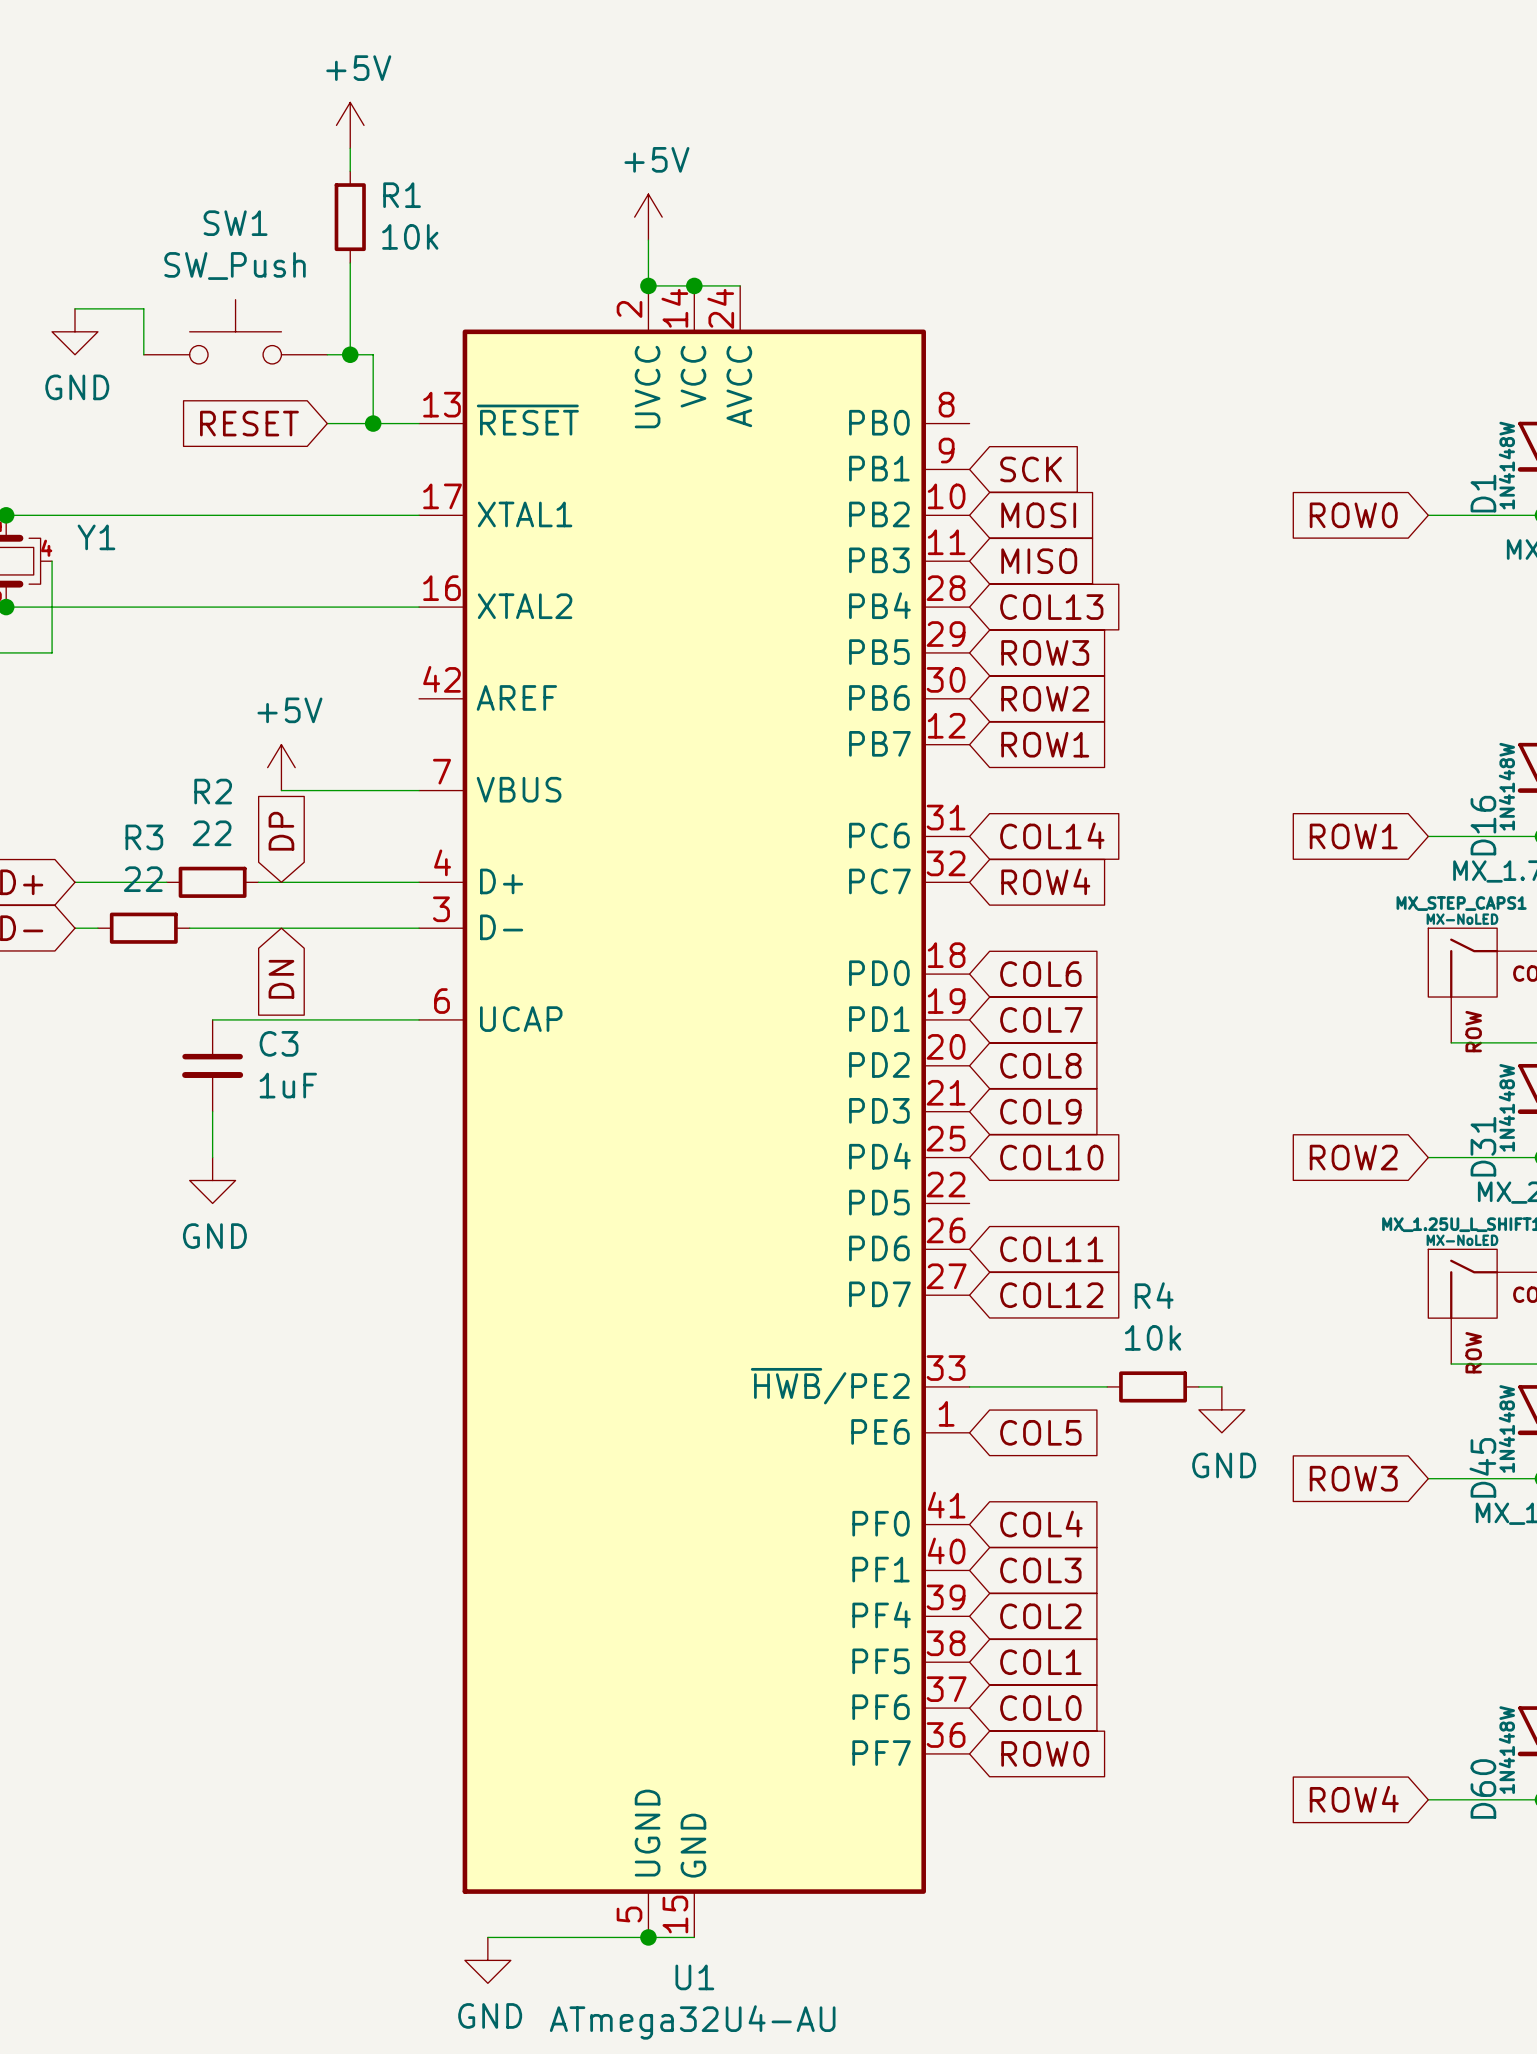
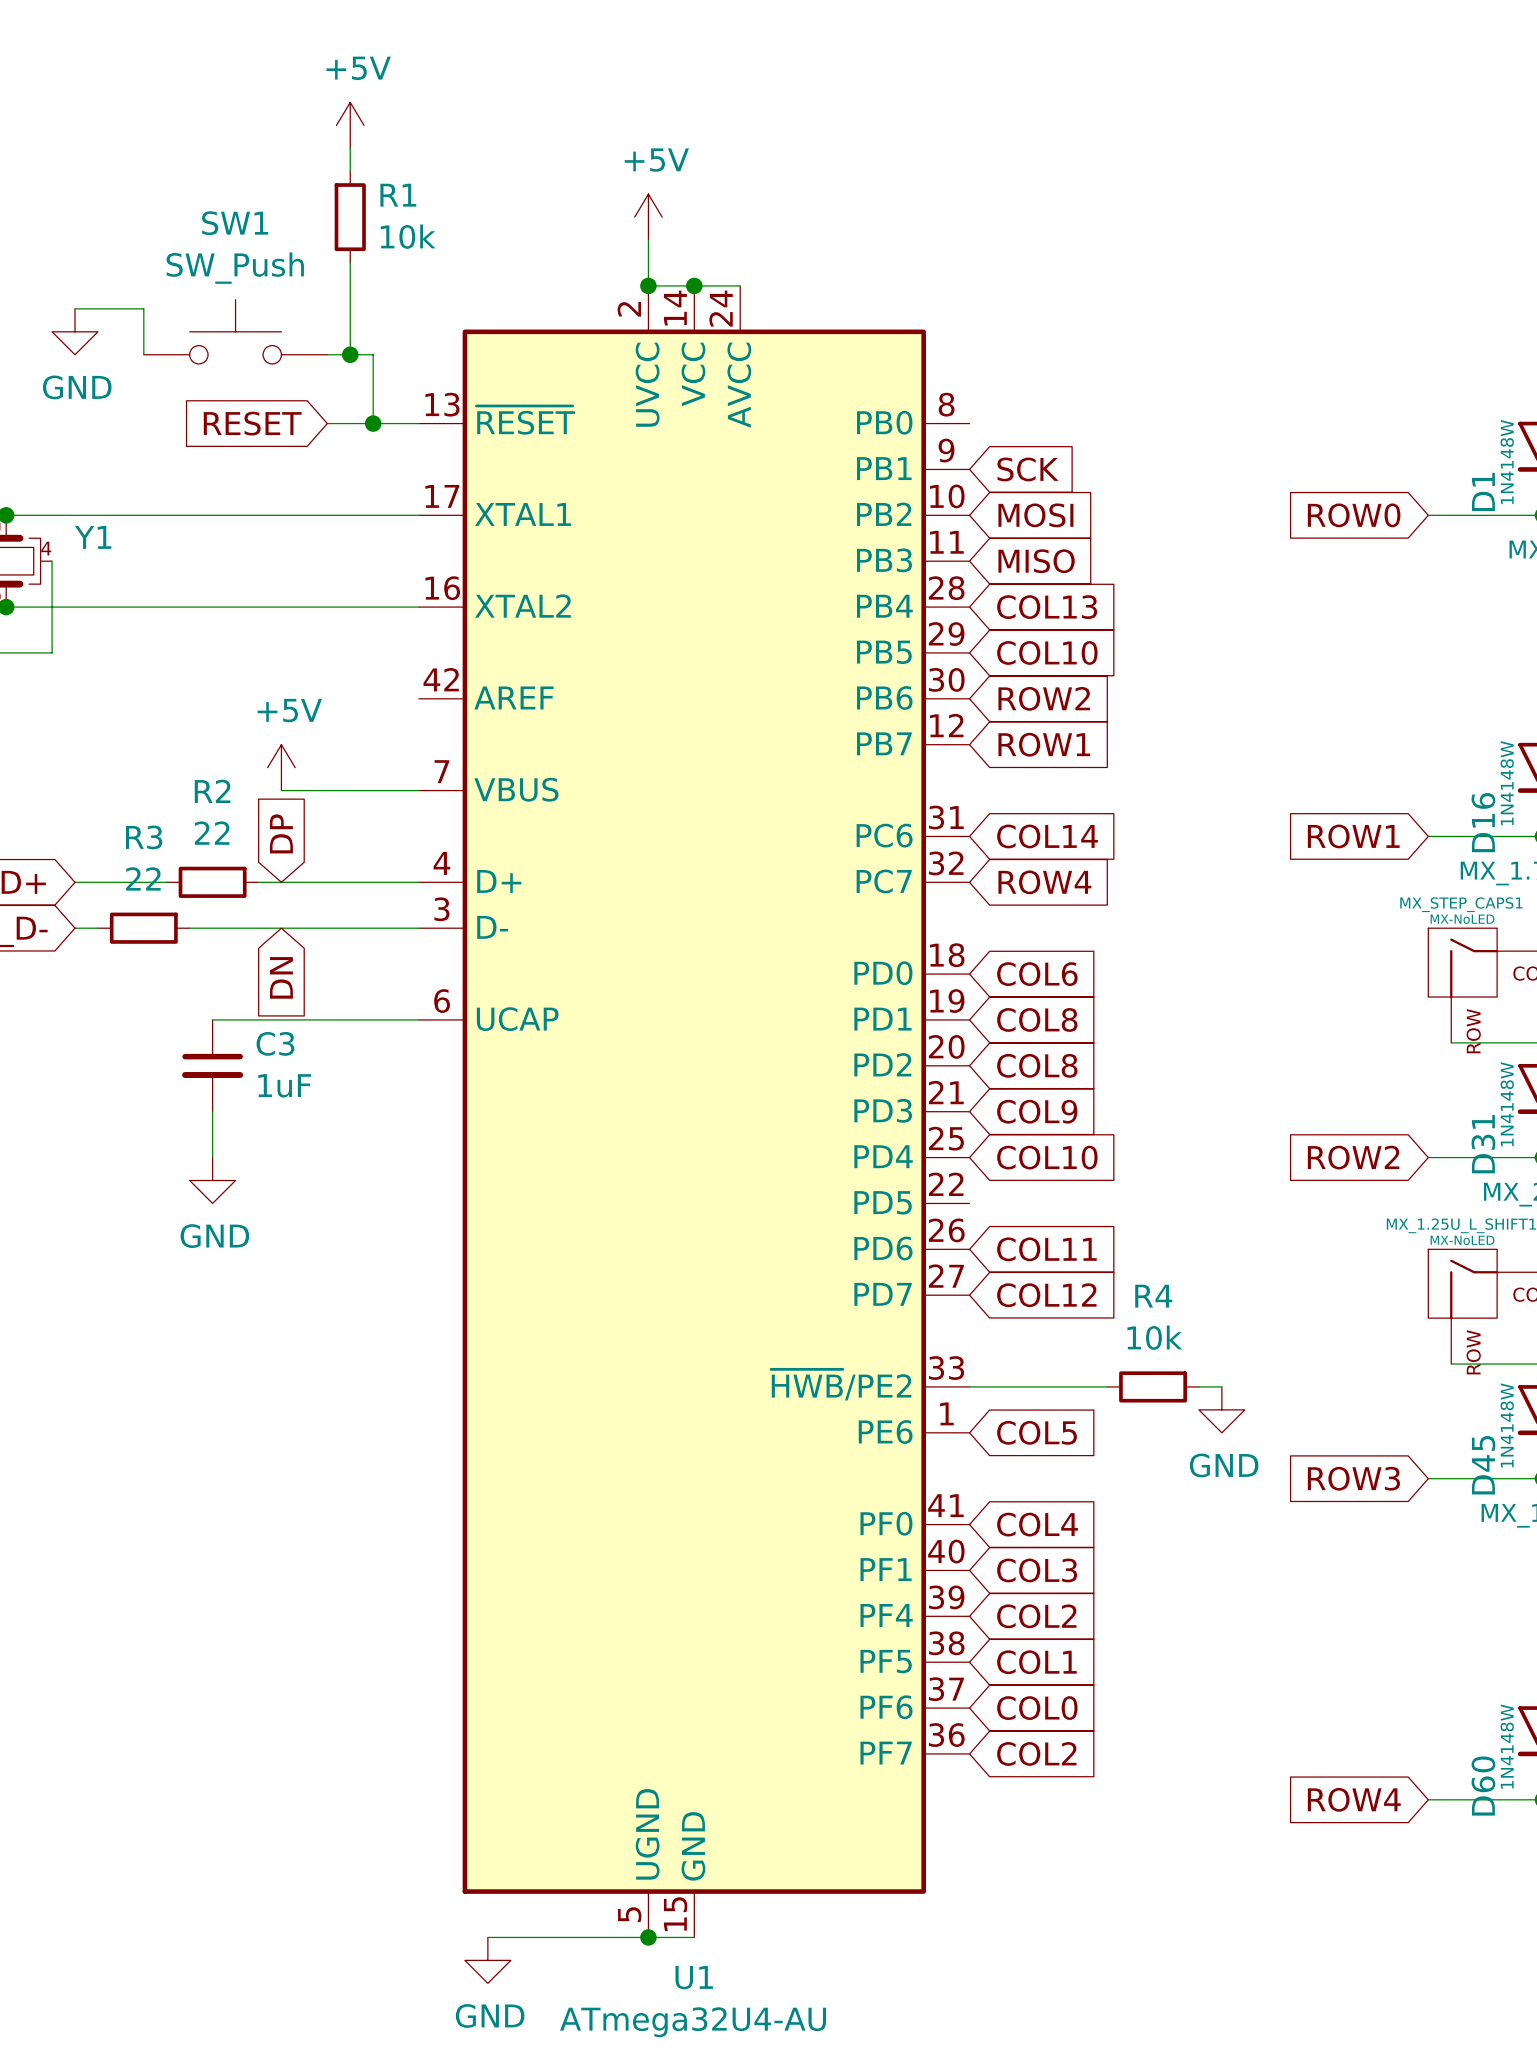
global label: ROW3 (1045, 652) -> COL10 (1047, 652)
global label: COL7 (1041, 1019) -> COL8 (1037, 1019)
global label: ROW0 (1045, 1753) -> COL2 (1036, 1753)

